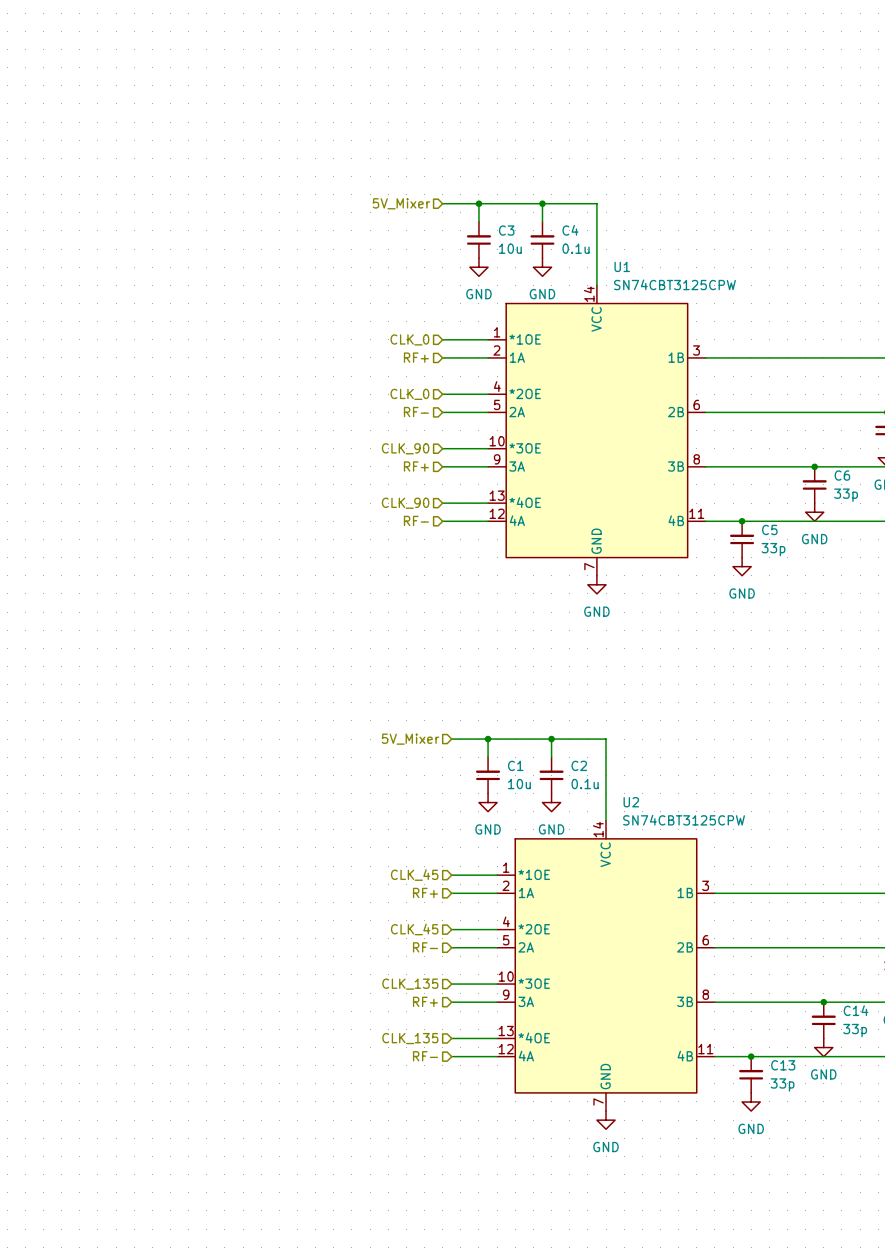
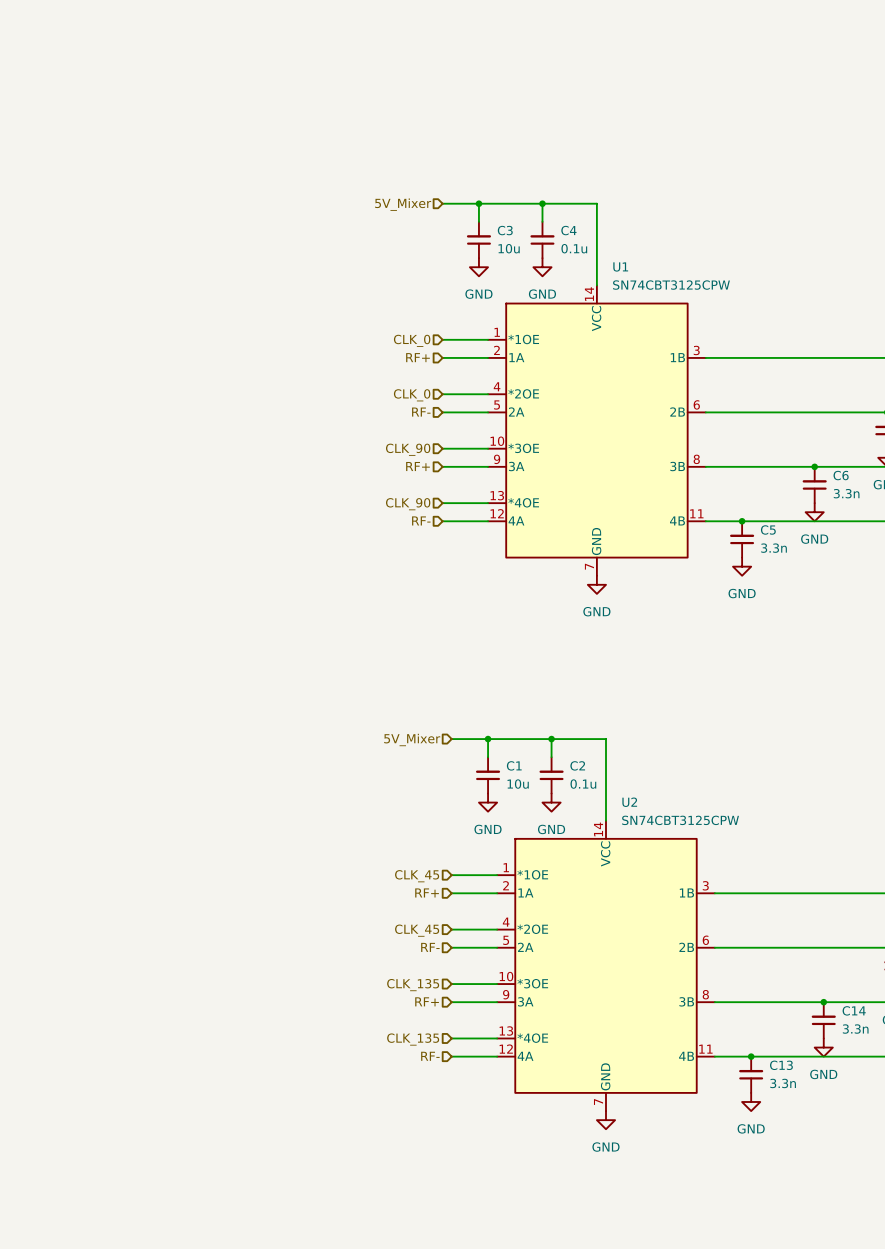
C6 value: 33p (846, 495) -> 3.3n (846, 493)
C5 value: 33p (773, 549) -> 3.3n (774, 548)
C14 value: 33p (855, 1030) -> 3.3n (855, 1029)
C13 value: 33p (782, 1084) -> 3.3n (783, 1083)

